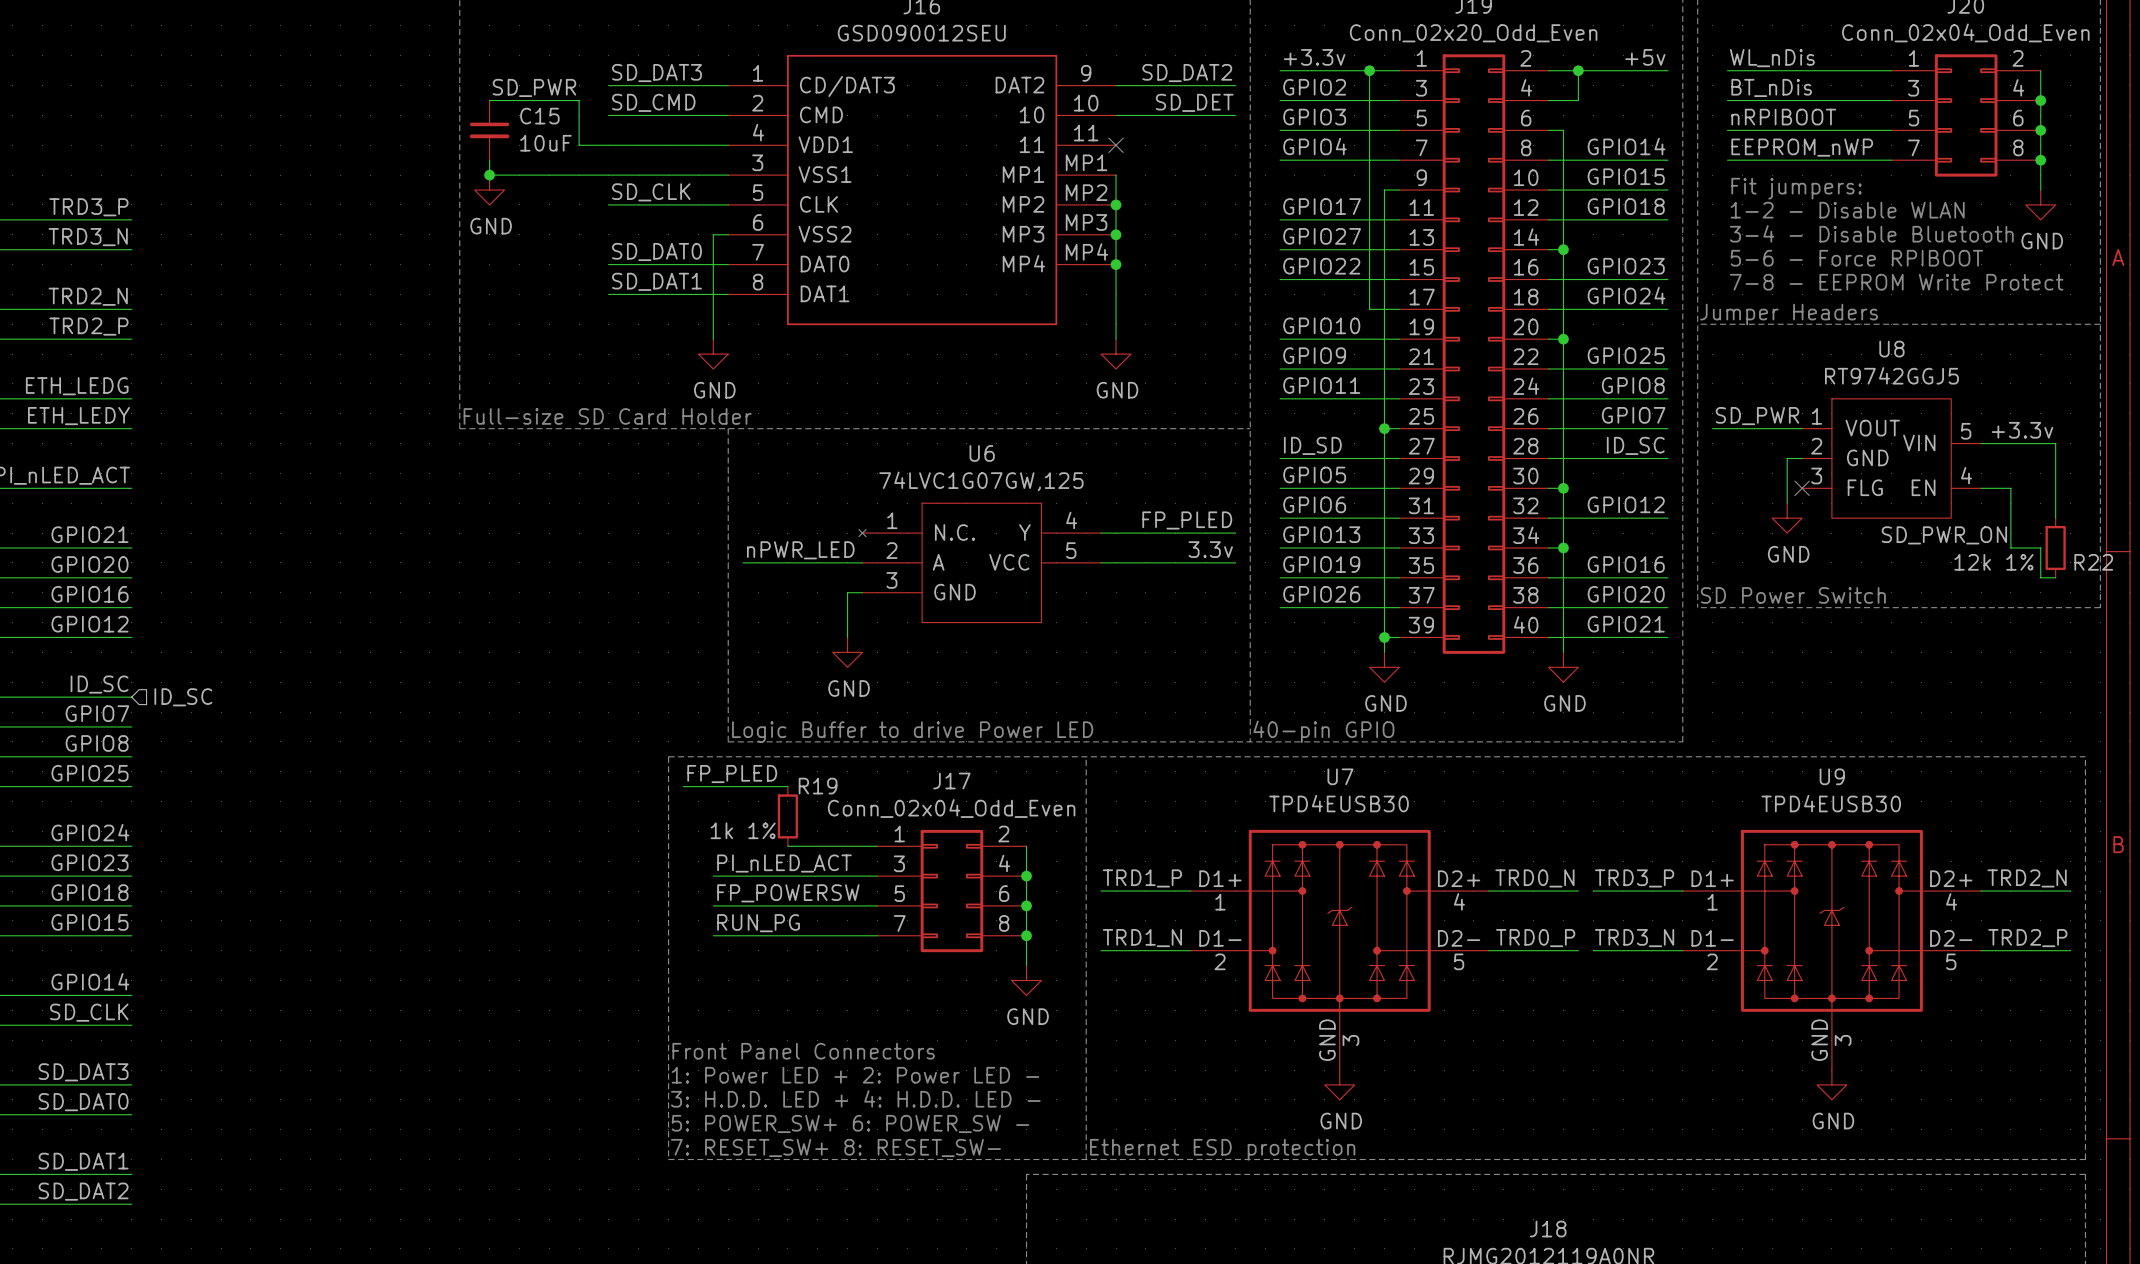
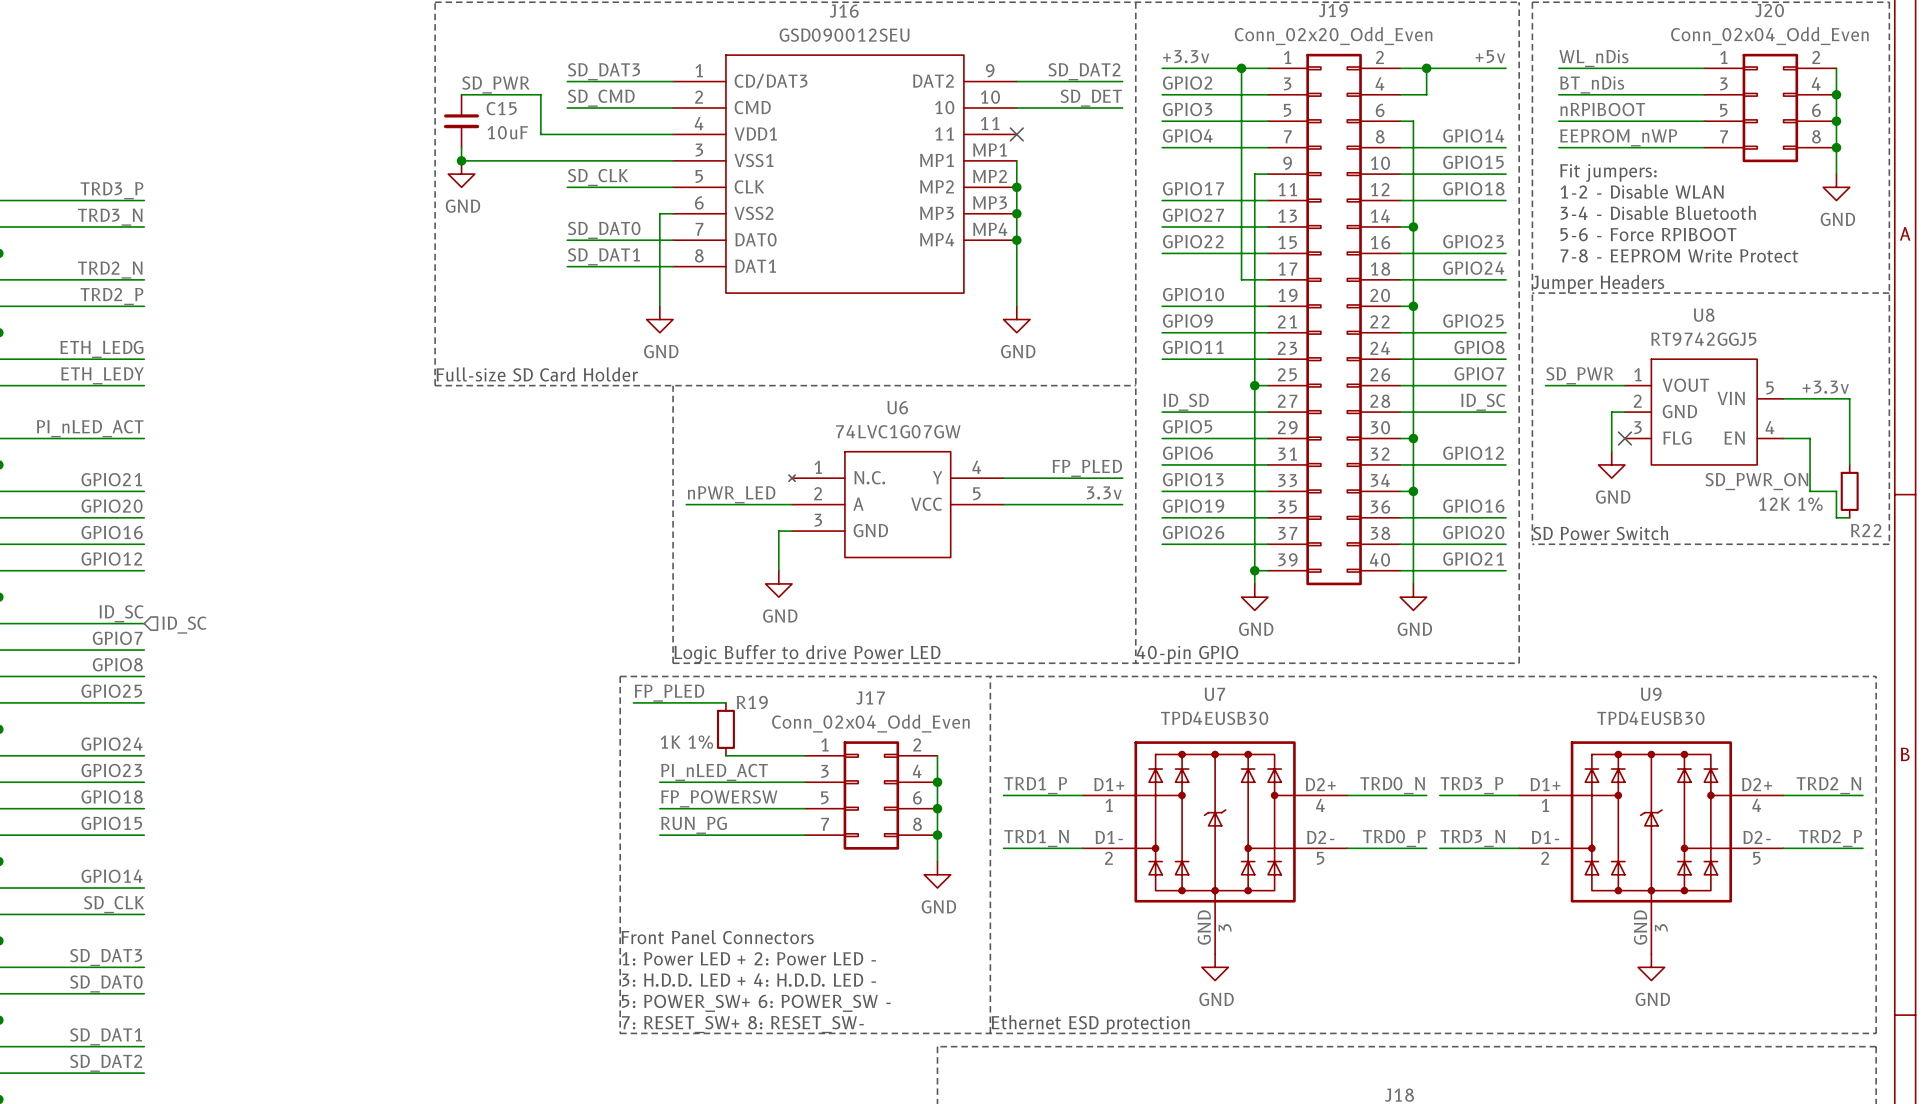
U6 value: 74LVC1G07GW,125 (981, 481) -> 74LVC1G07GW (898, 431)
R22 value: 12k 1% (1993, 562) -> 12K 1% (1790, 504)
R22 name position: R22 (2093, 562) -> R22 (1866, 530)
R19 value: 1k 1% (743, 830) -> 1K 1% (686, 742)

